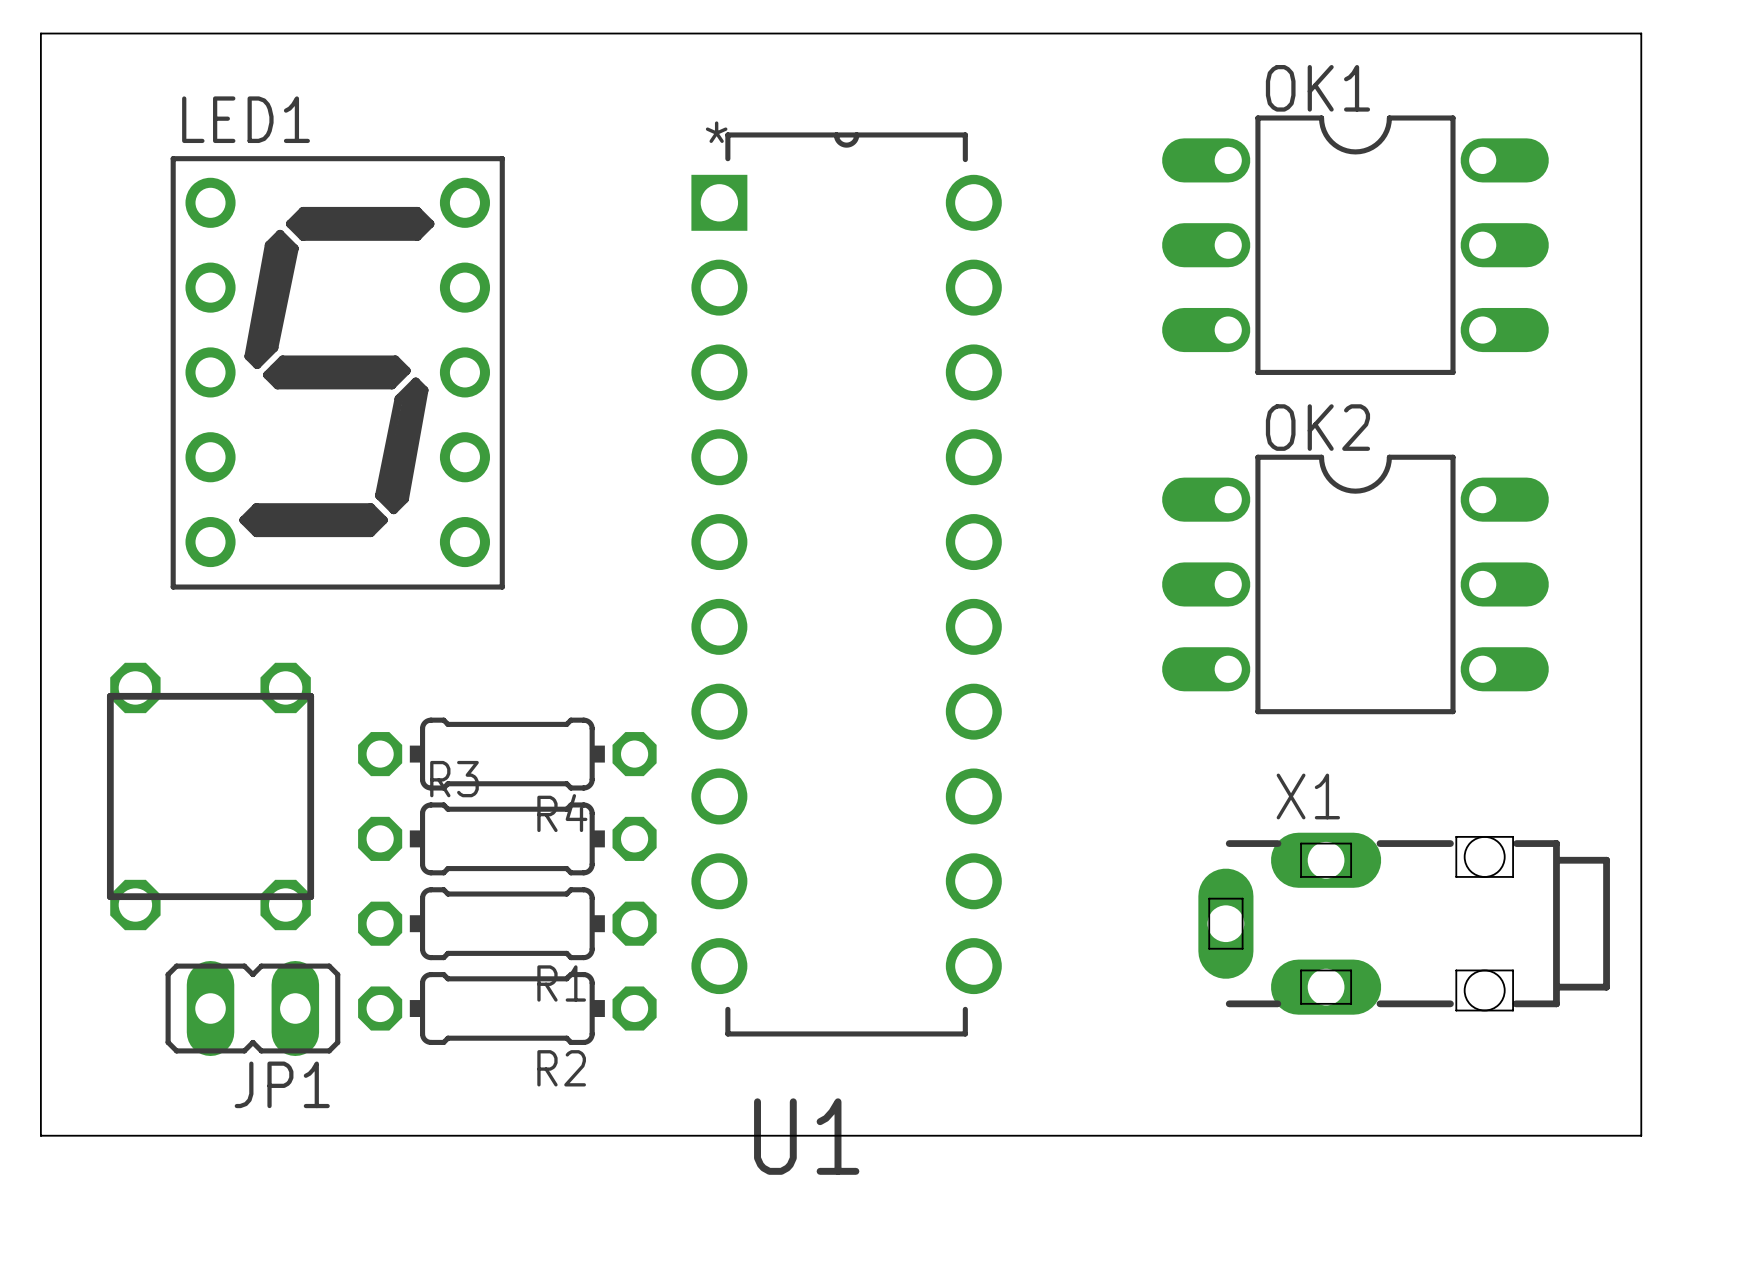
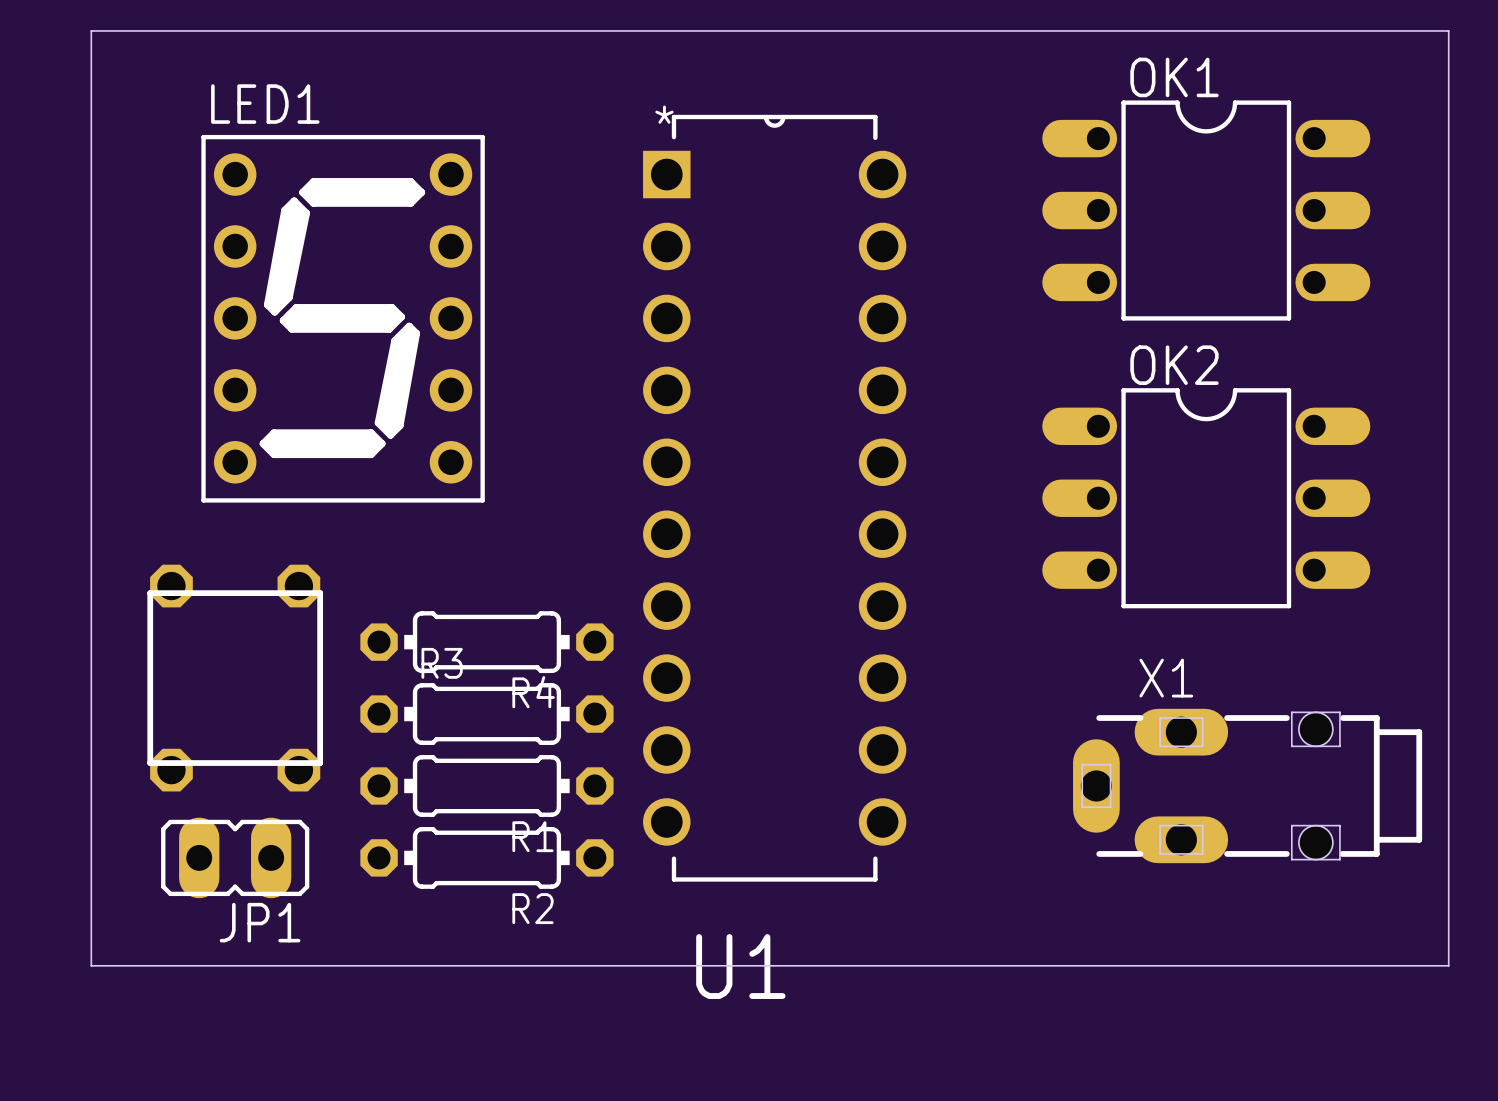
JP1 position: (252, 1008) -> (235, 857)

